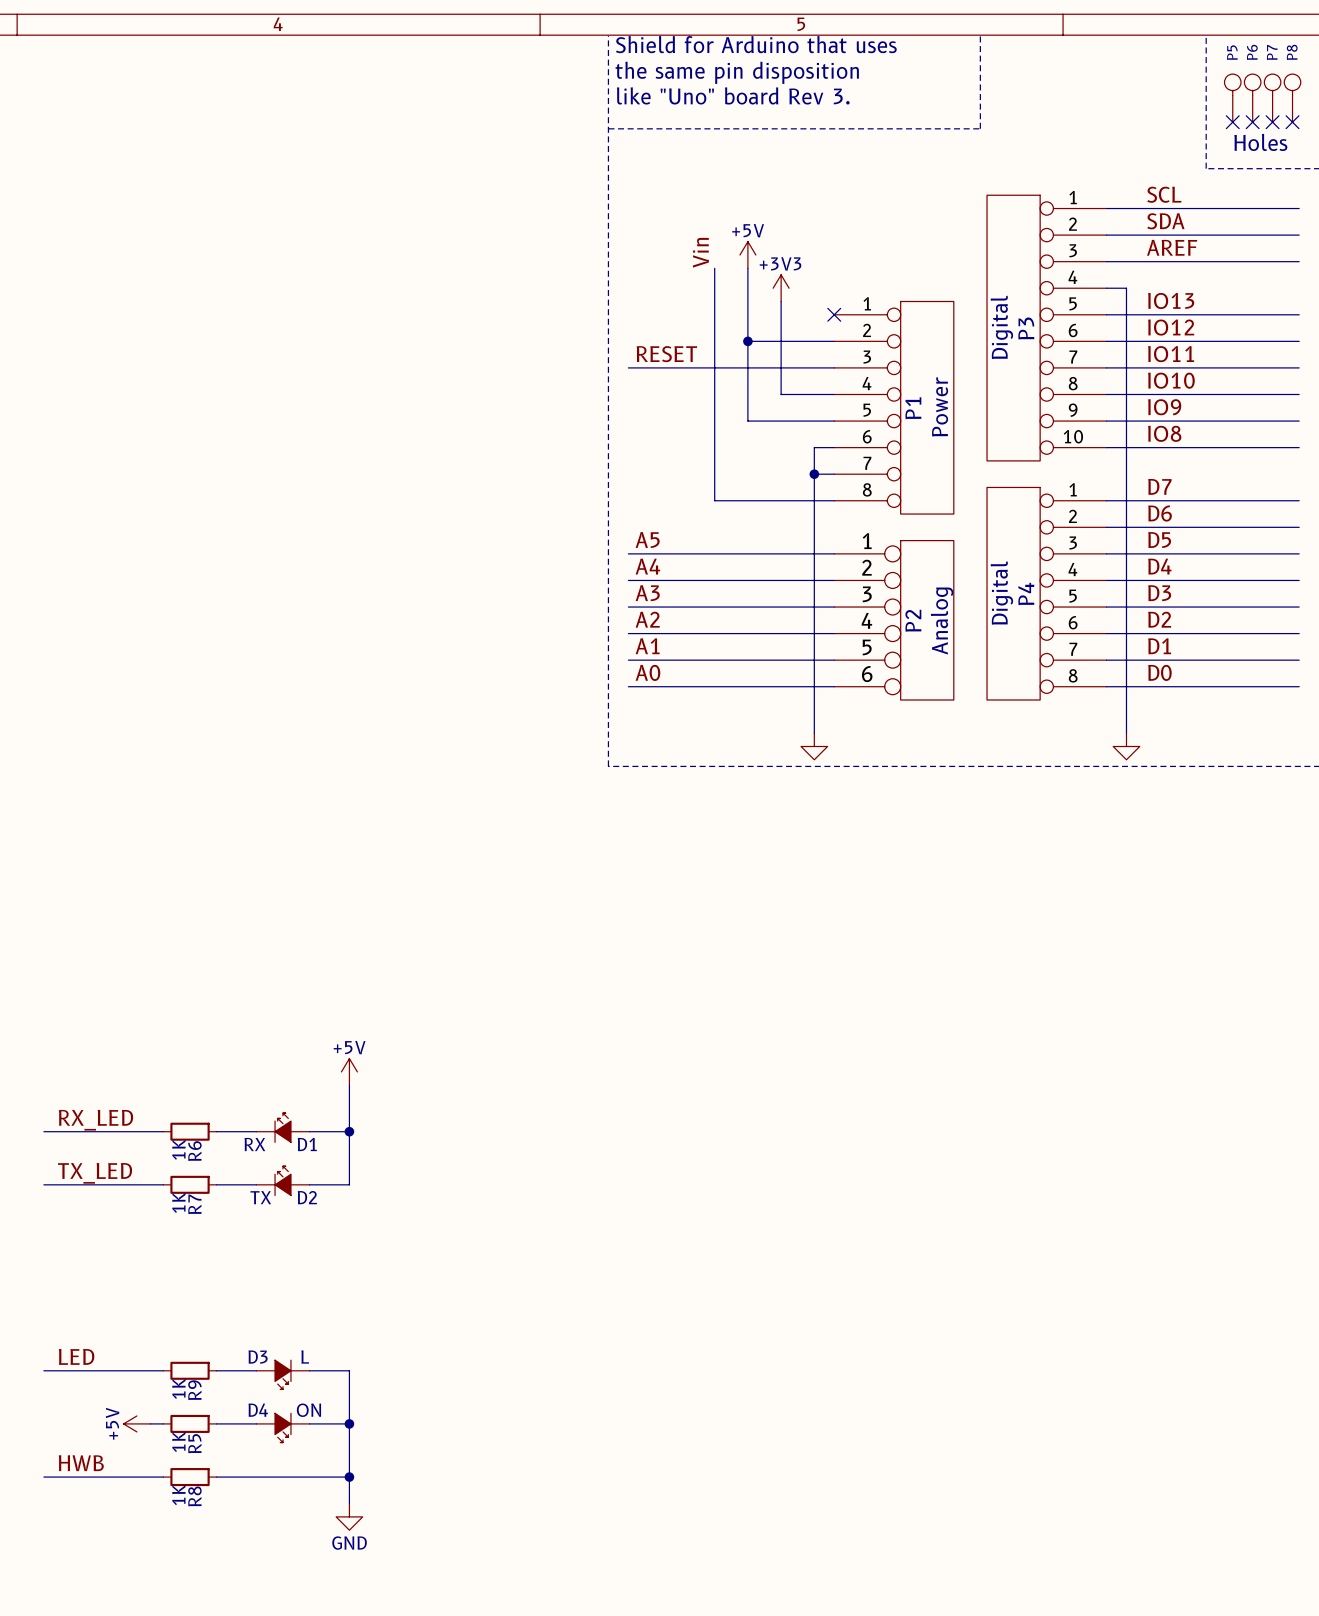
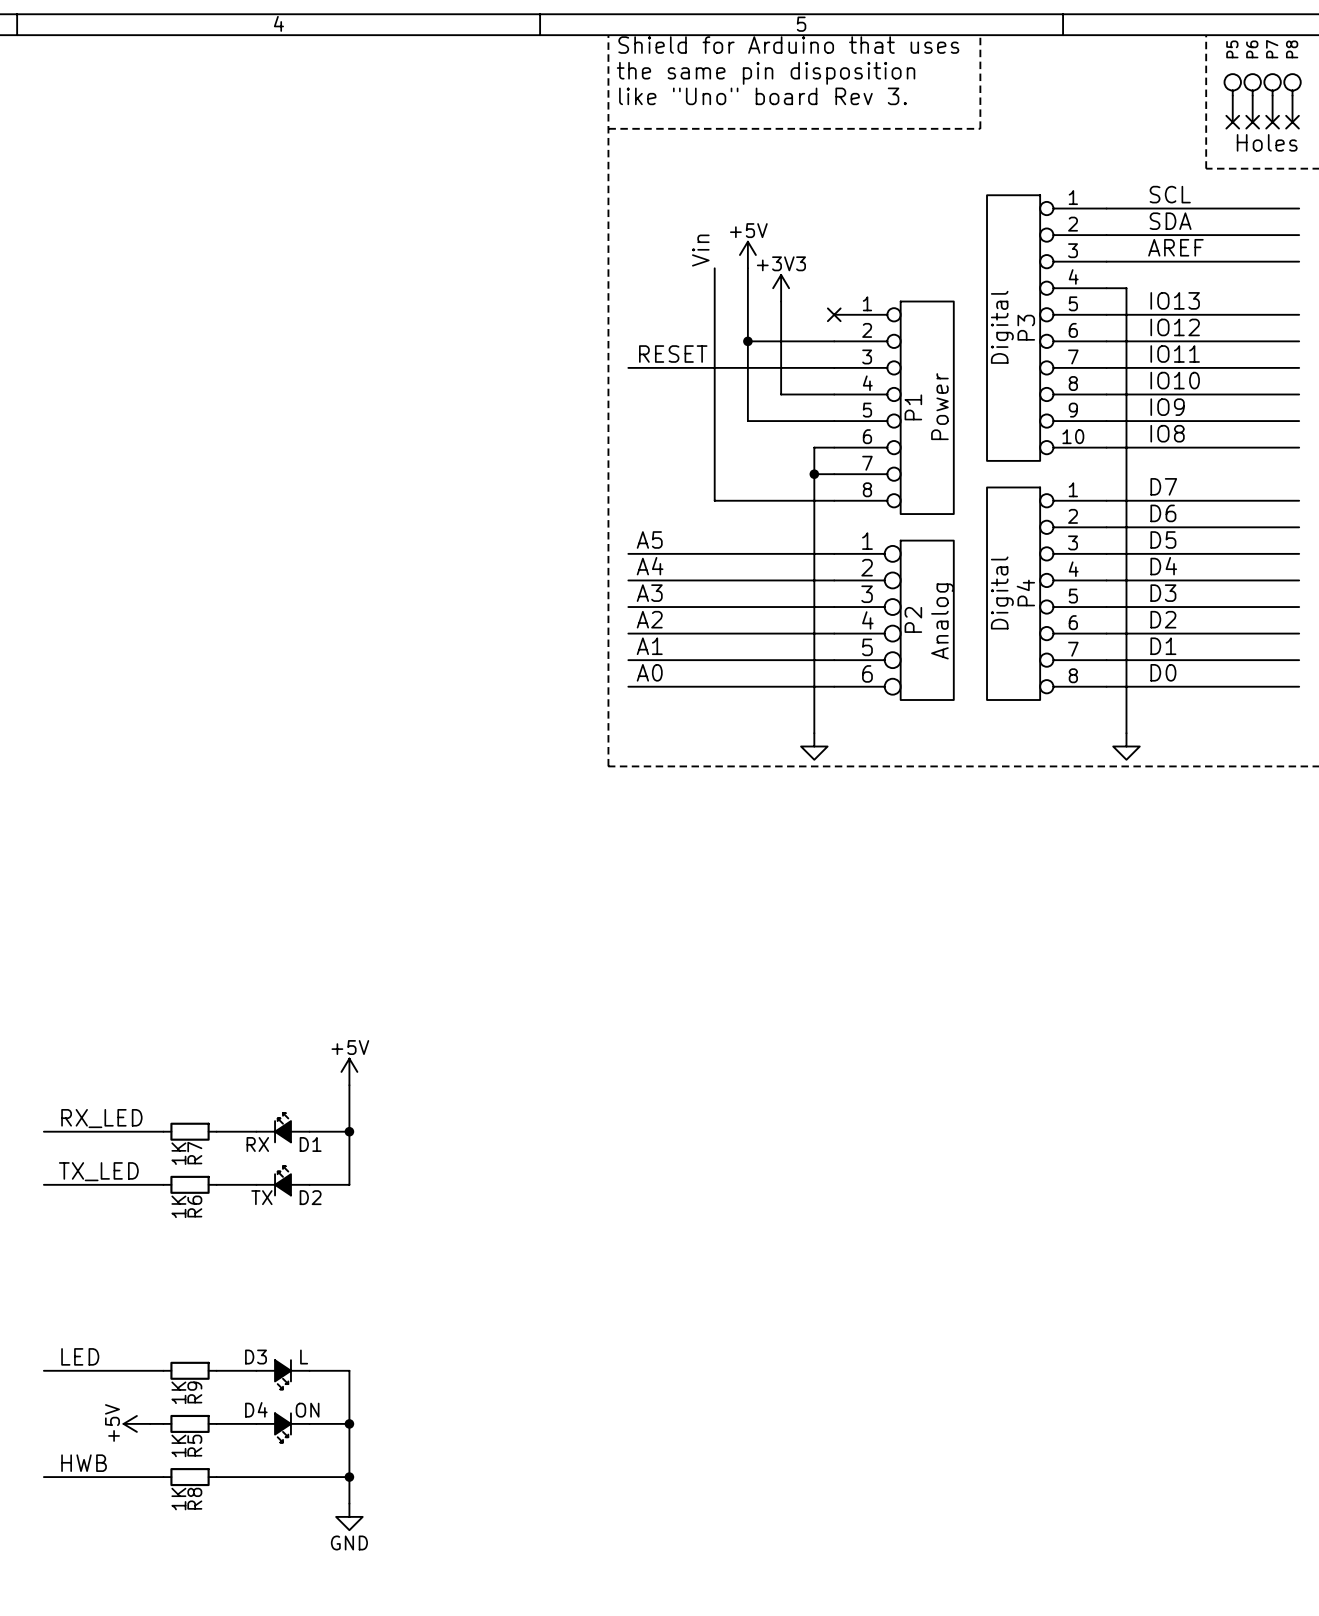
R6 name: R6 (194, 1151) -> R7 (194, 1153)
R7 name: R7 (194, 1204) -> R6 (194, 1206)

